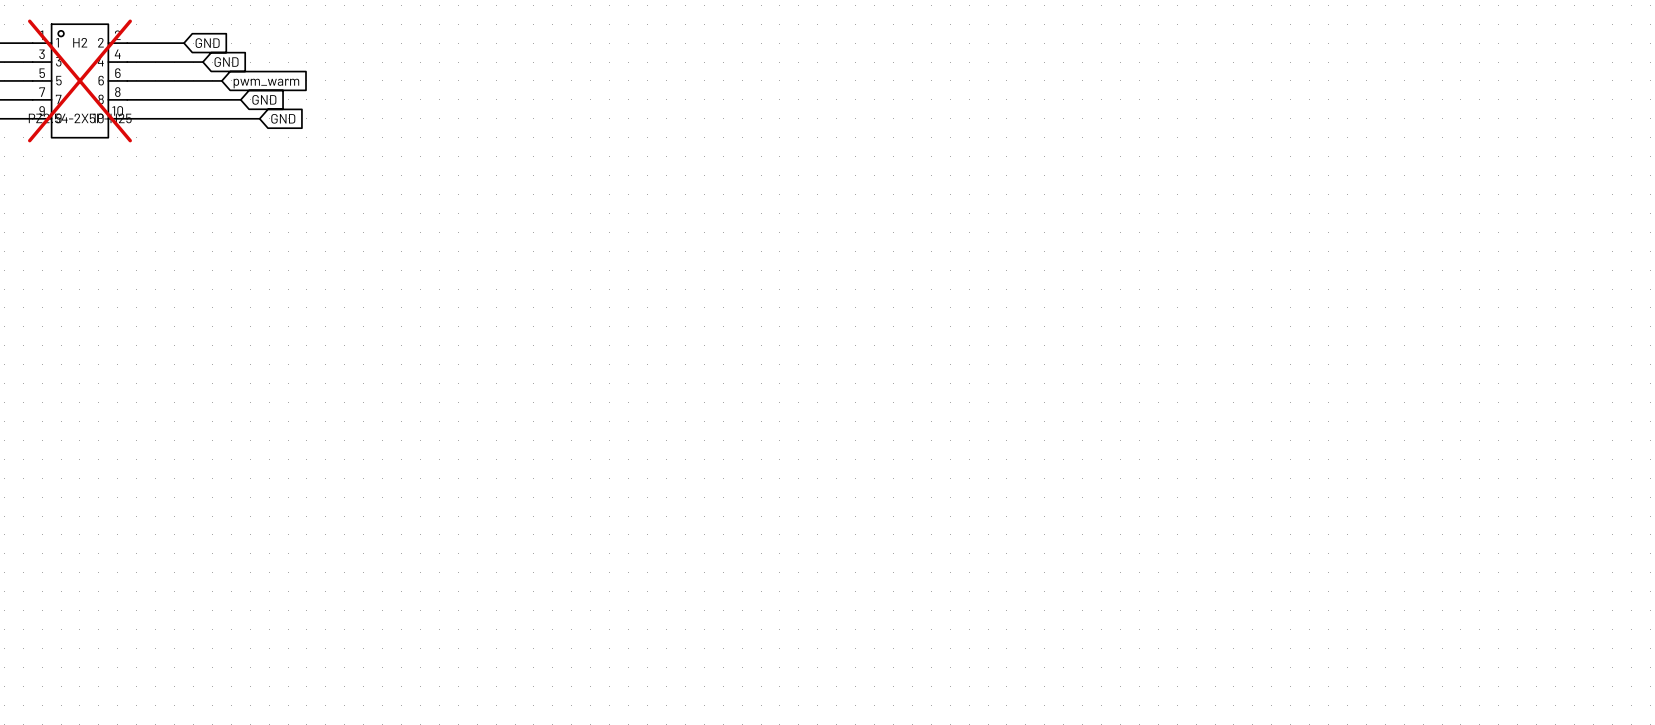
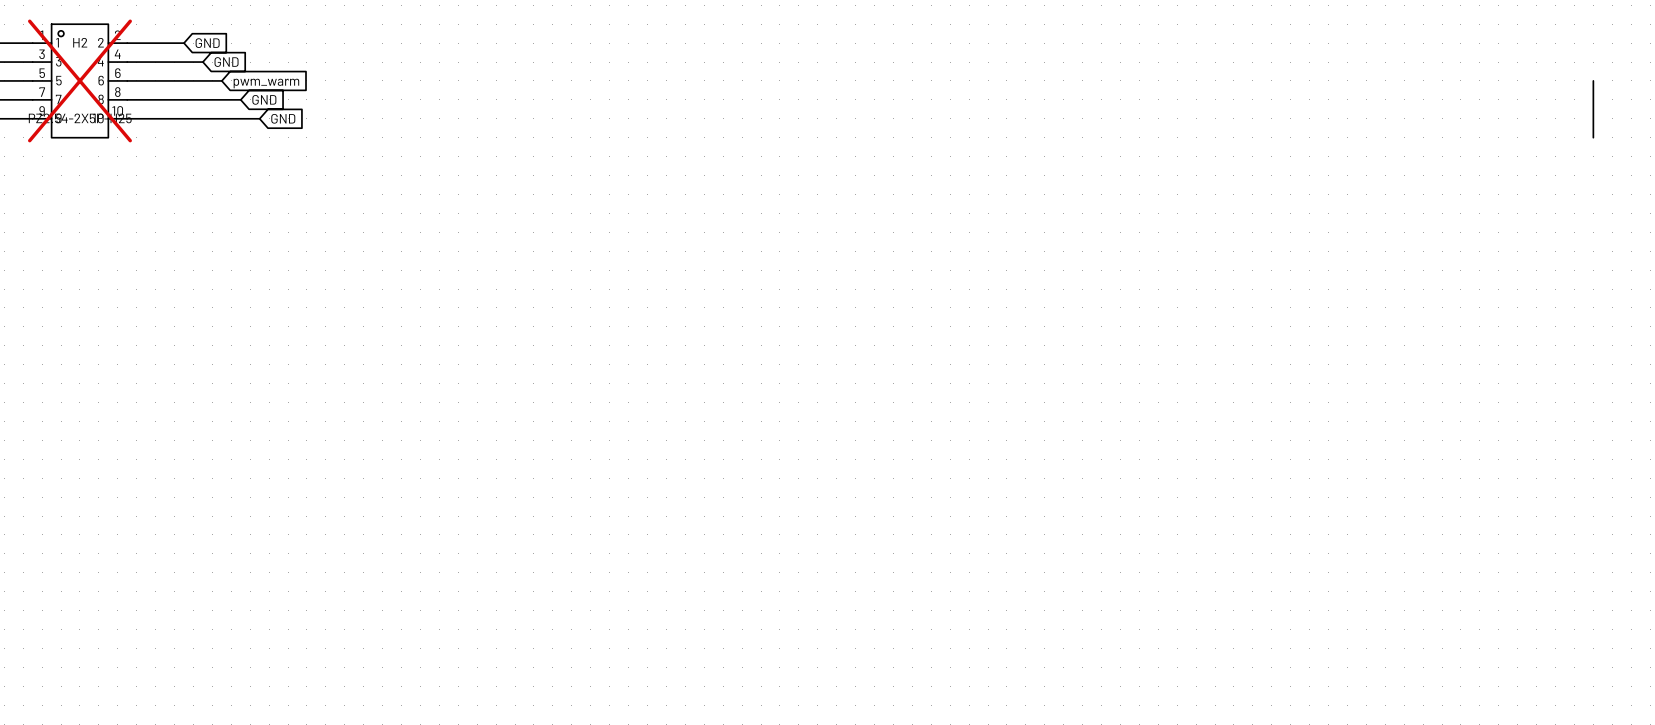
wire: none -> (1593, 80) (1593, 137)

